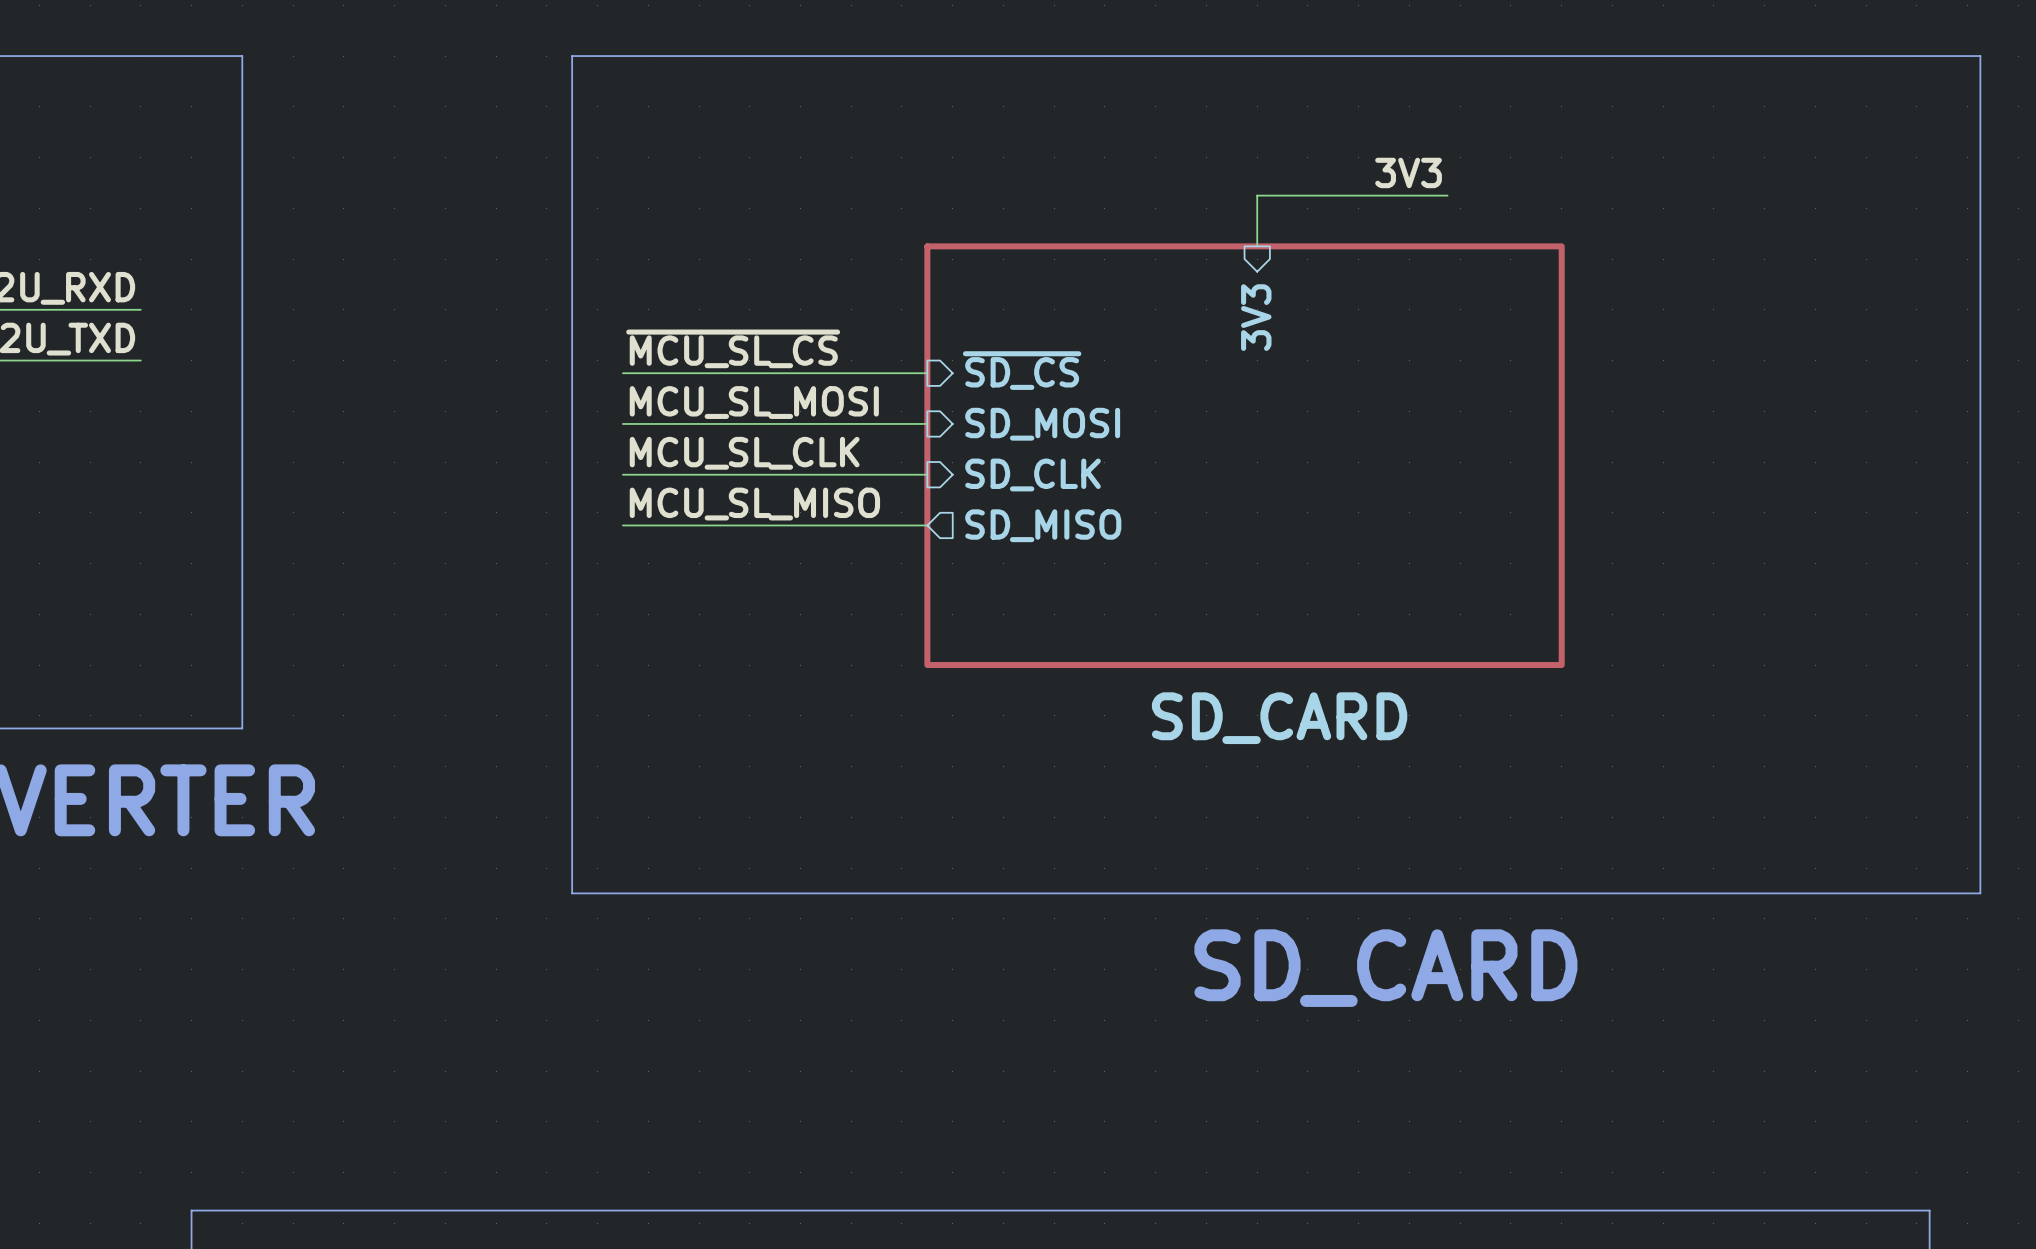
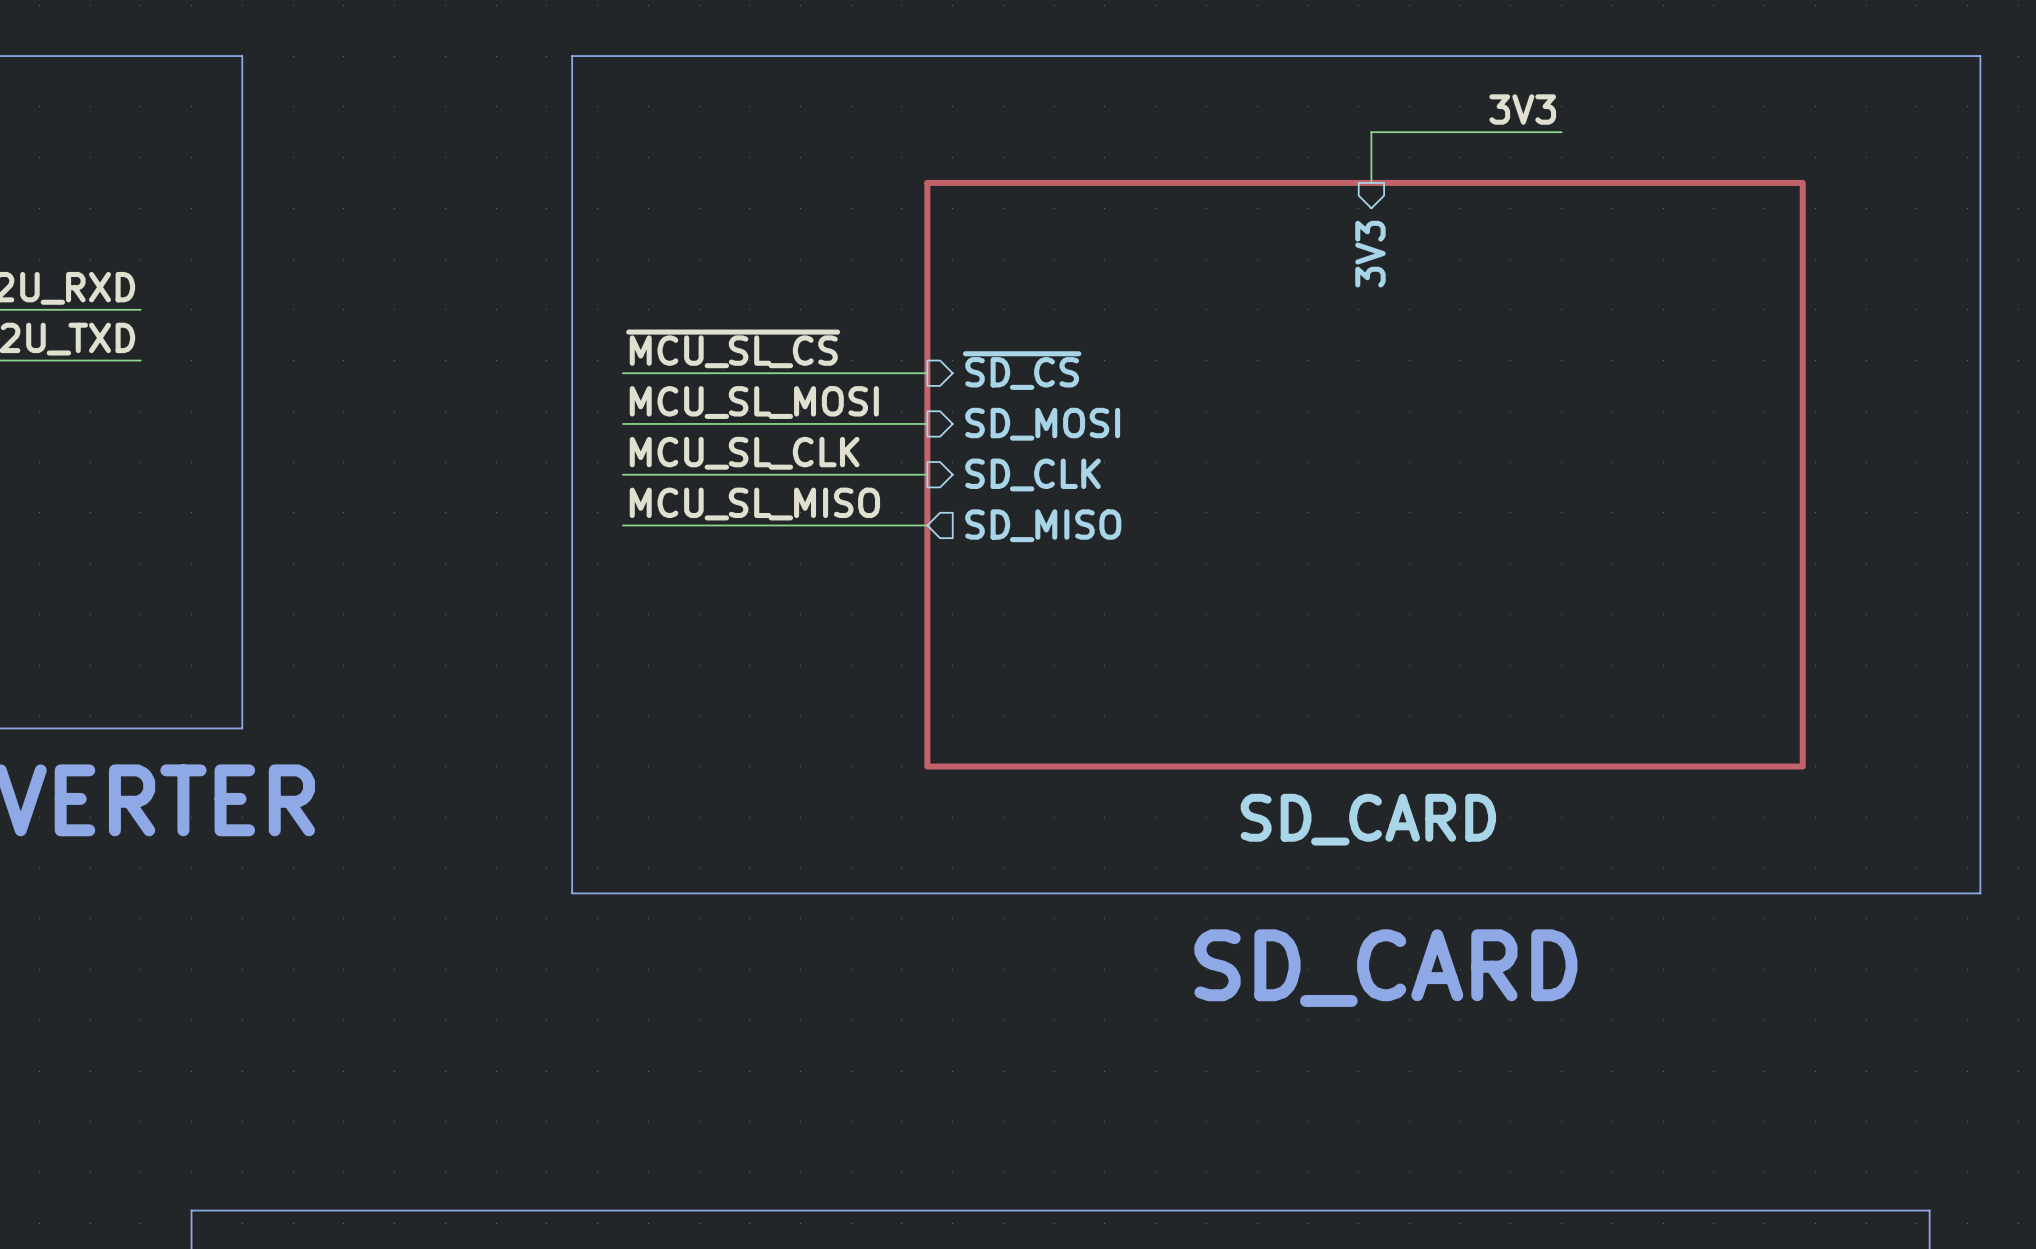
label position: 3V3 (1408, 172) -> 3V3 (1522, 109)
wire: (1447, 195) (1257, 195) (1257, 246) -> (1561, 132) (1371, 132) (1371, 182)
sheet pin position: 3V3 (1256, 317) -> 3V3 (1370, 254)
sheet SD_CARD: (1244, 455) -> none
sheet SD_CARD: none -> (1365, 474)

